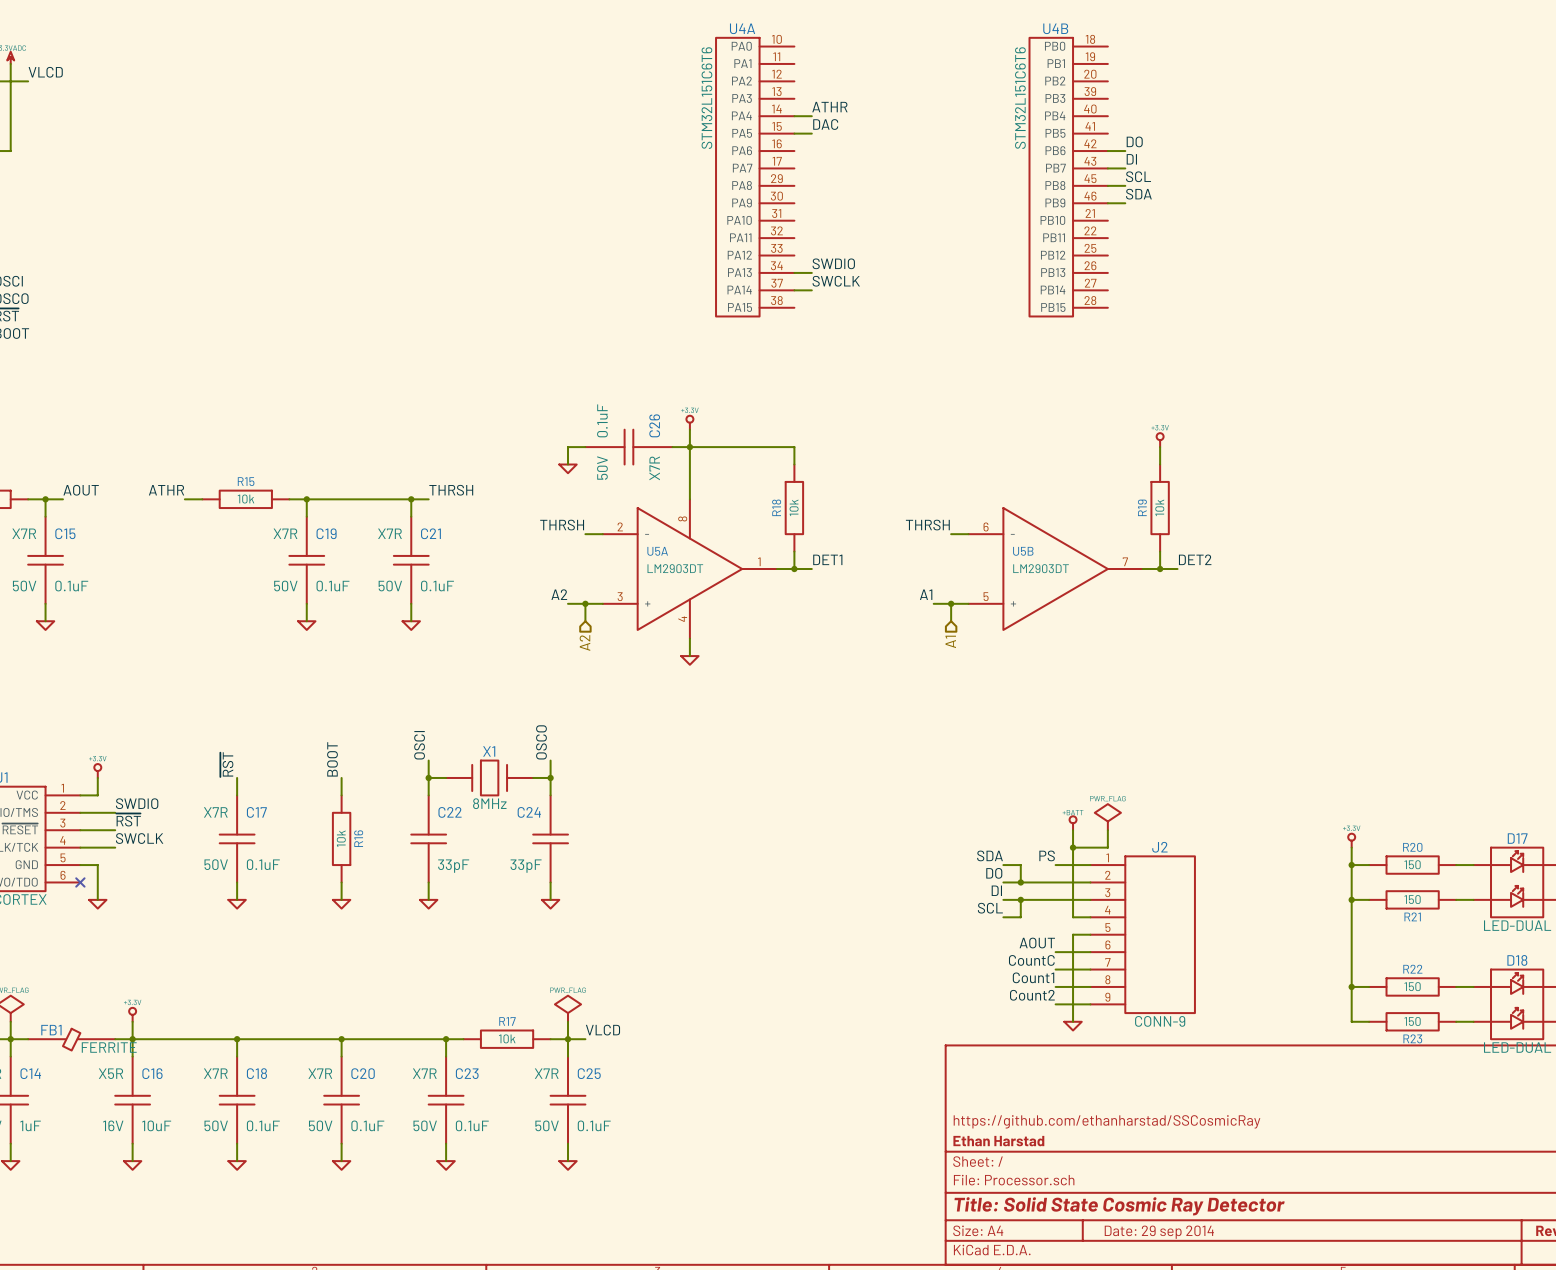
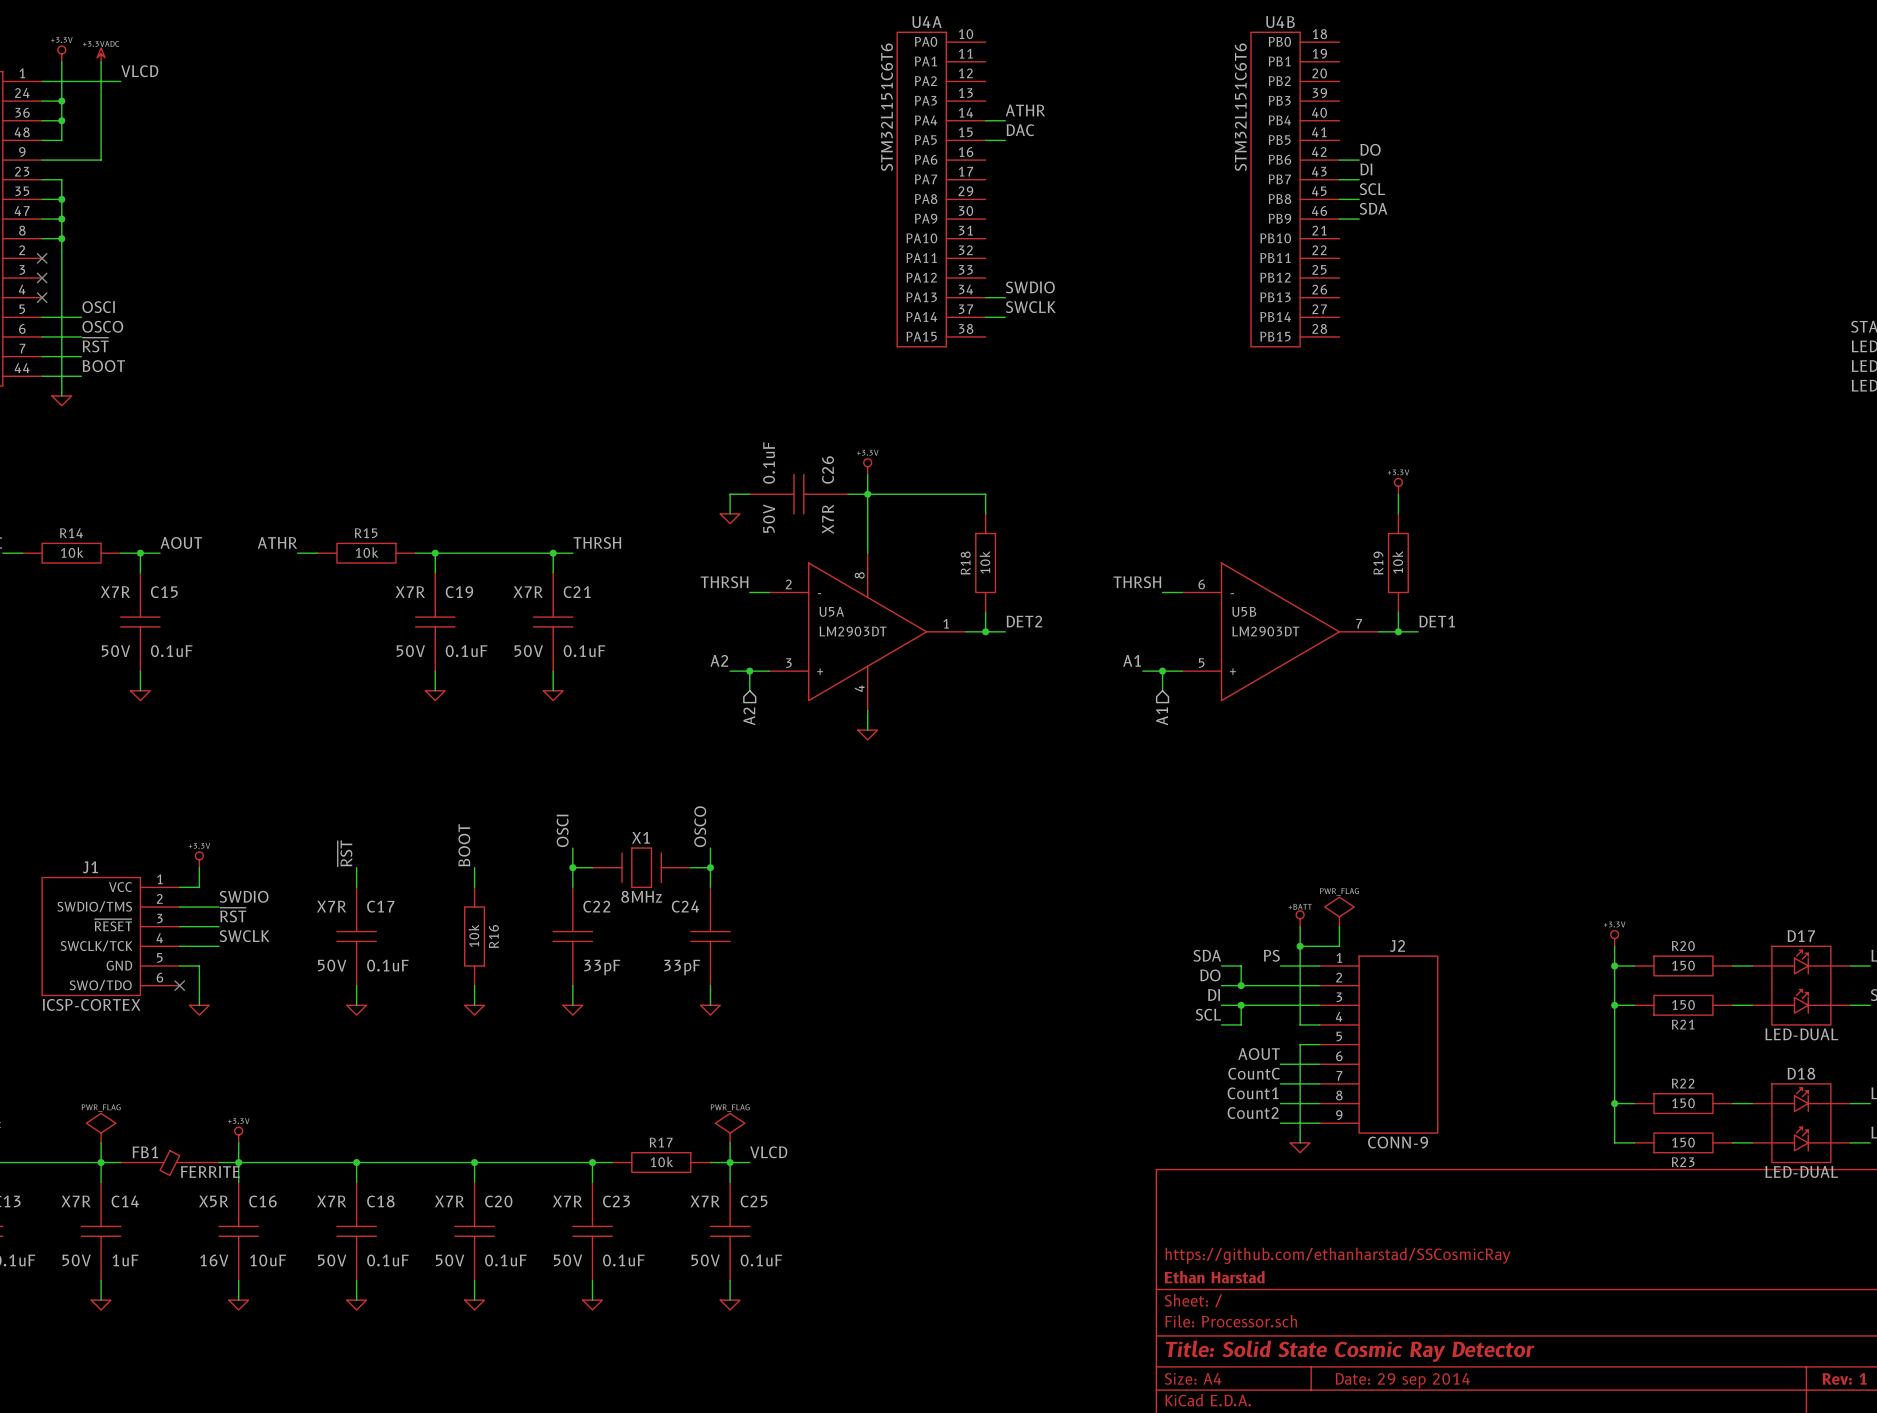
label: DET1 (827, 559) -> DET2 (1024, 621)
label: DET2 (1195, 559) -> DET1 (1437, 621)

